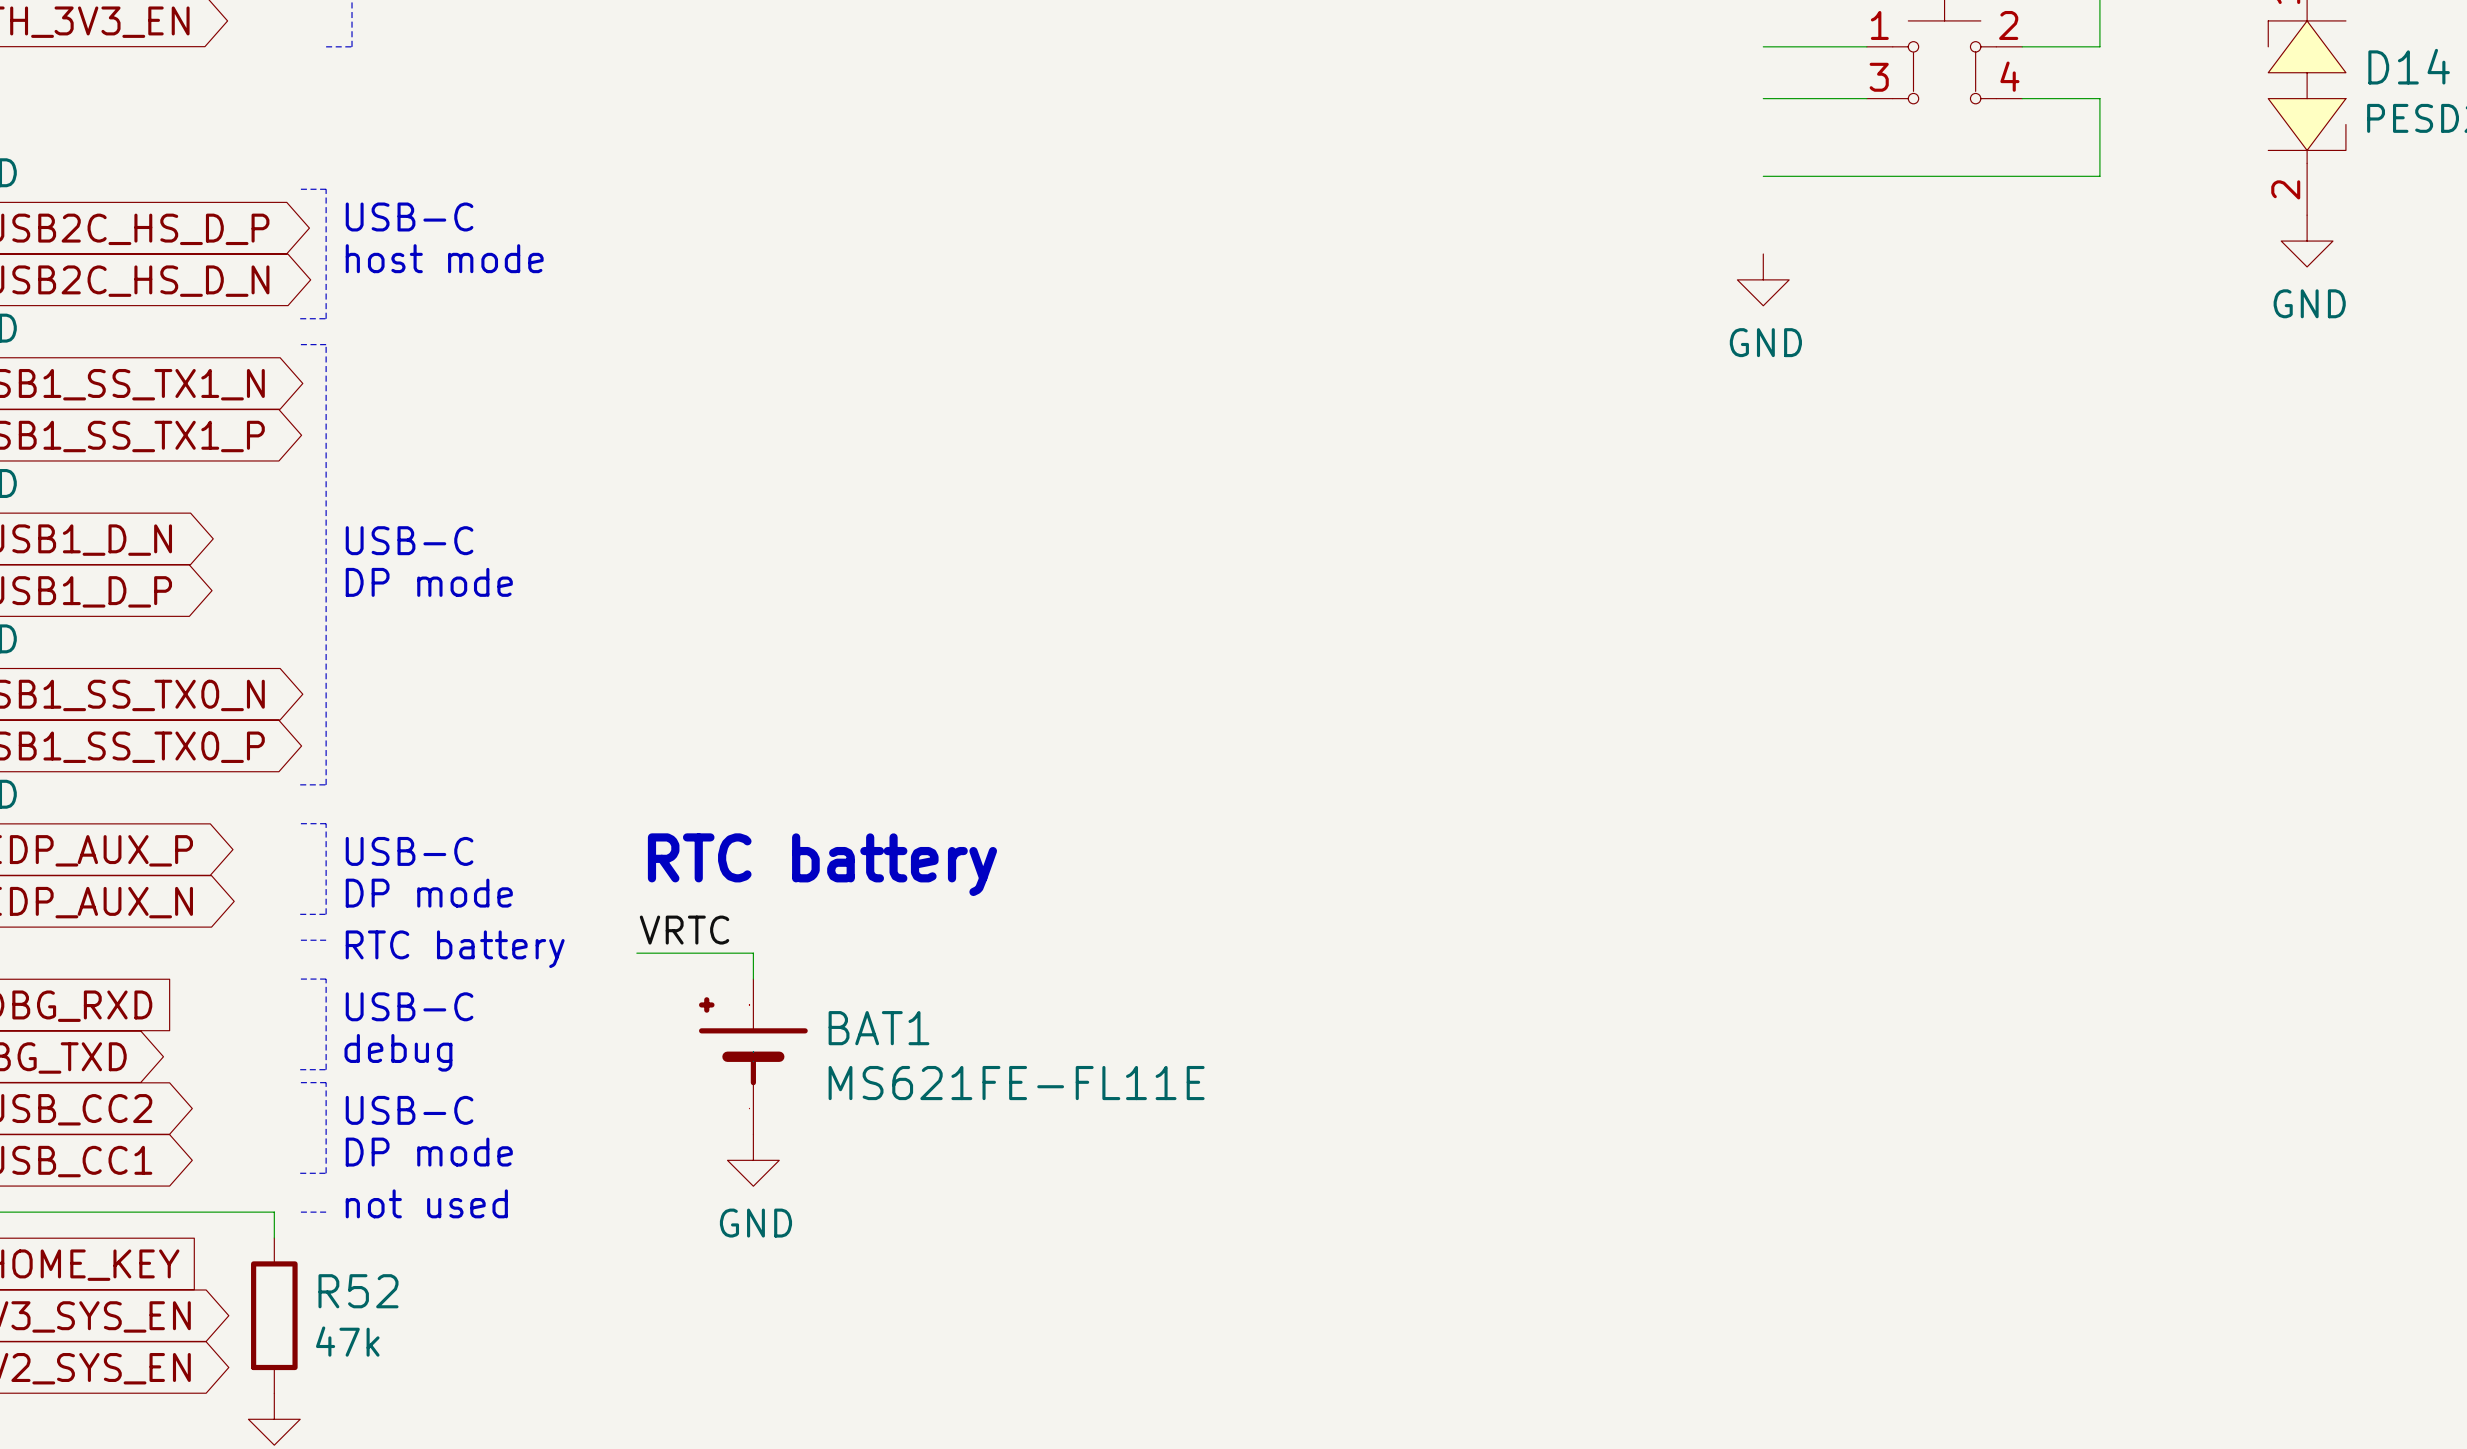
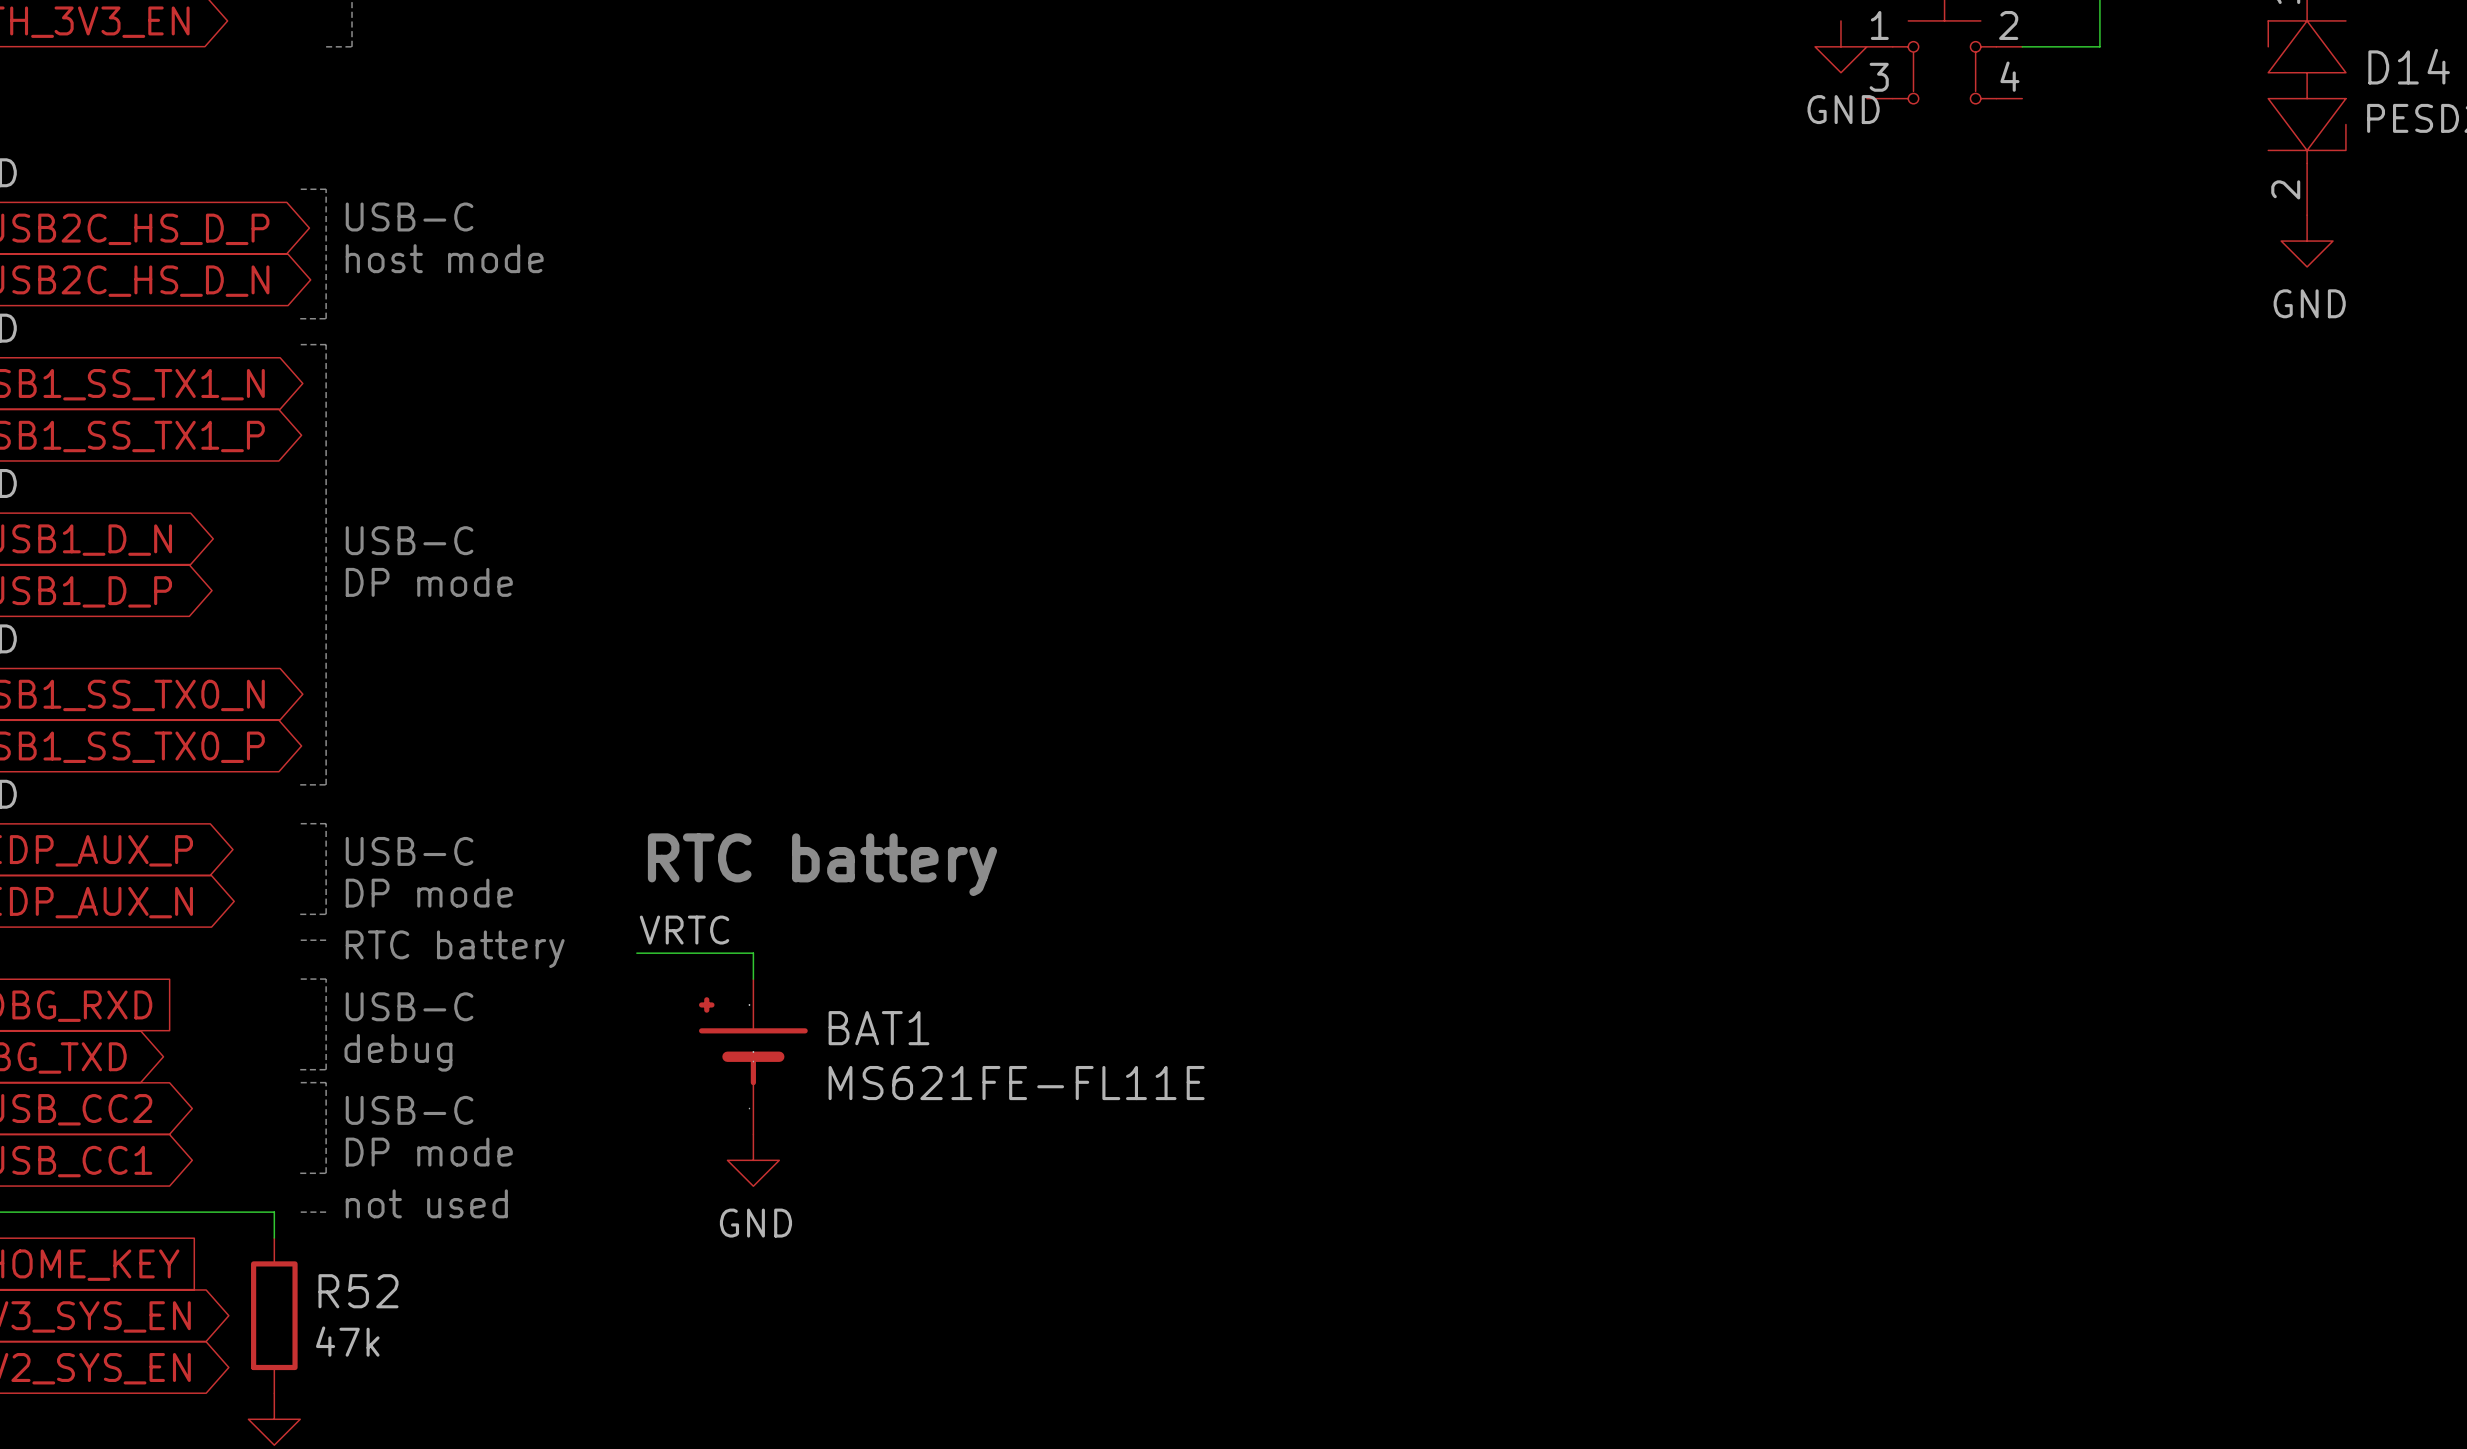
wire: (1763, 46) (1866, 46) -> none
power symbol: none -> GND (1840, 46)
wire: (1763, 98) (1866, 98) -> none
wire: (2022, 98) (2099, 98) (2099, 176) (1763, 176) -> none
power symbol: GND (1763, 279) -> none

